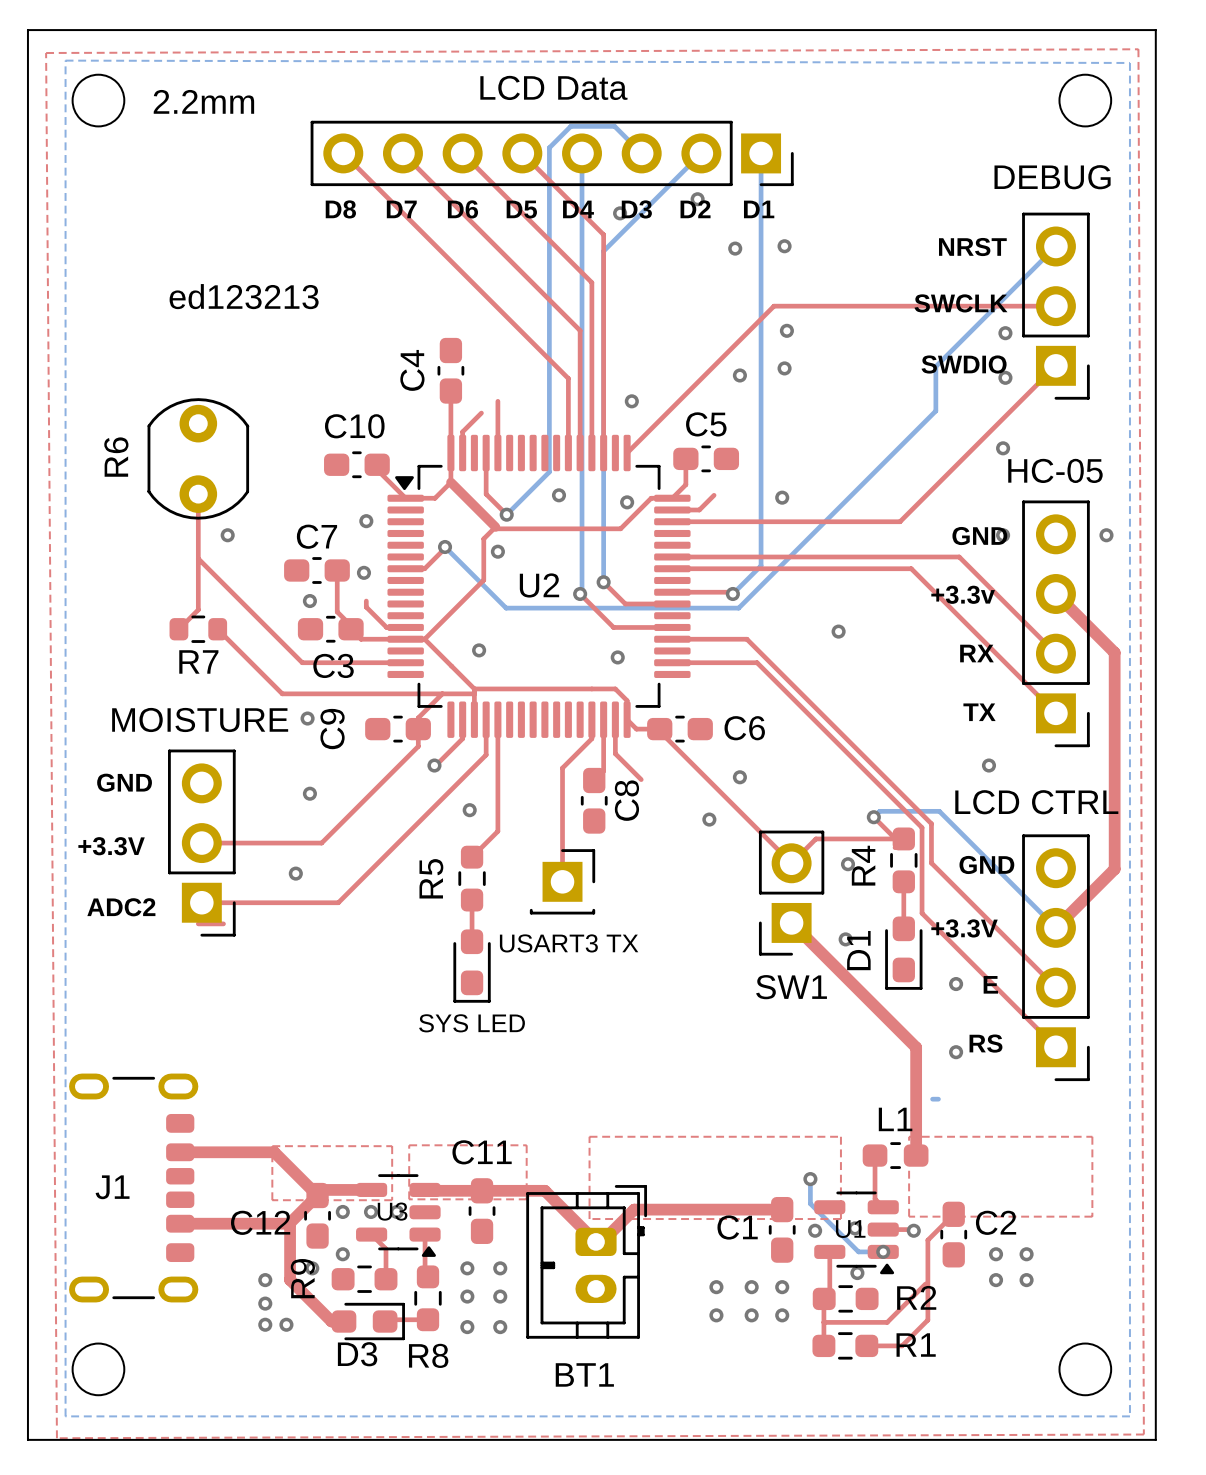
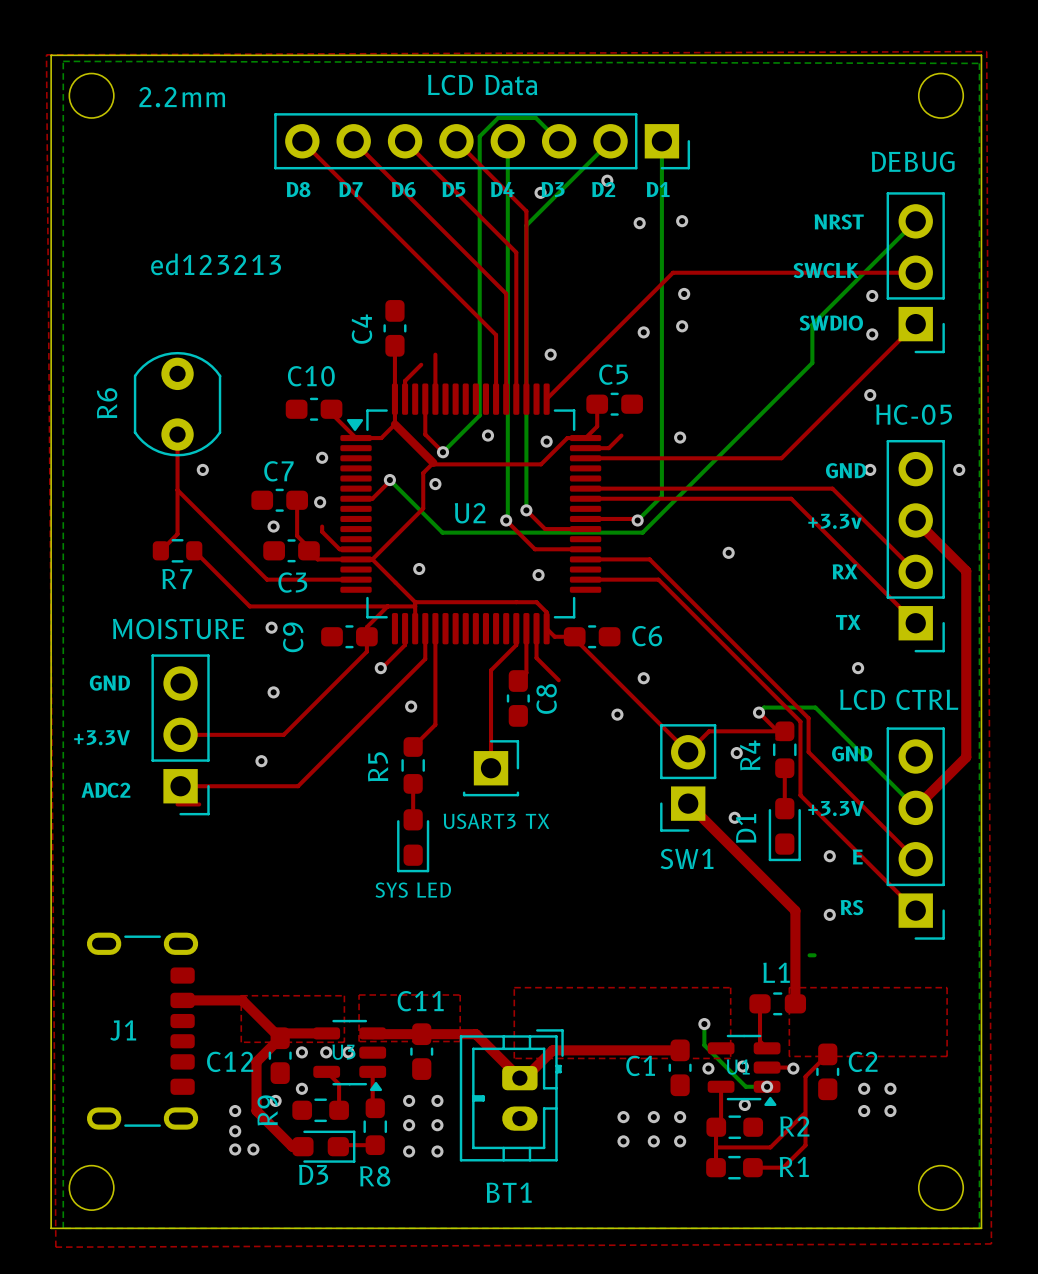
board edge: (27, 30) (1155, 30) (1155, 1439) (27, 1439) (27, 30) -> (51, 55) (51, 1228) (981, 1228) (981, 55) (51, 55)
top track: (180, 1152) (274, 1152) -> (182, 1000) (242, 1001)
J1 position: (133, 1187) -> (142, 1031)
top track: (317, 1195) (289, 1223) (180, 1223) -> none

